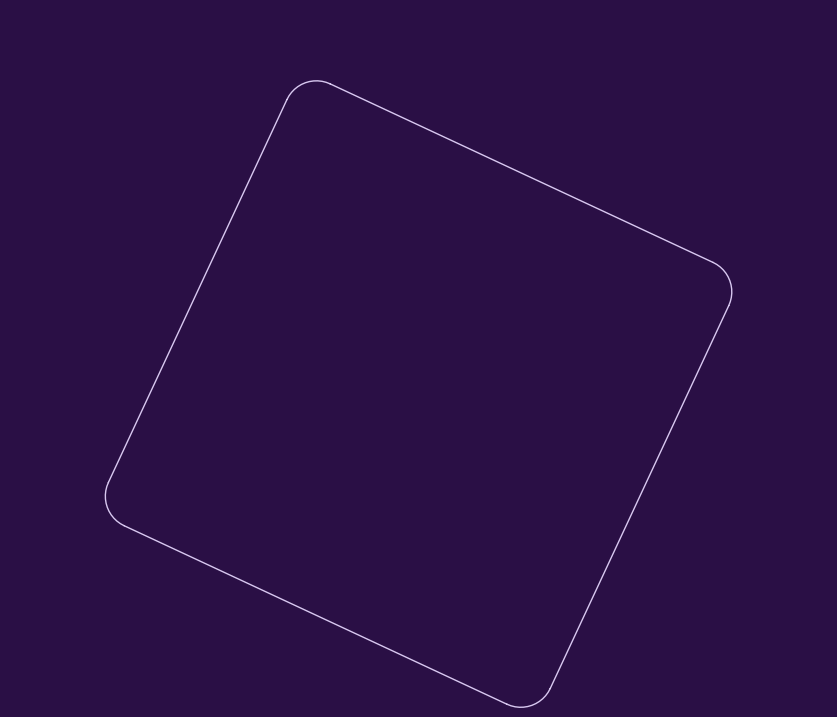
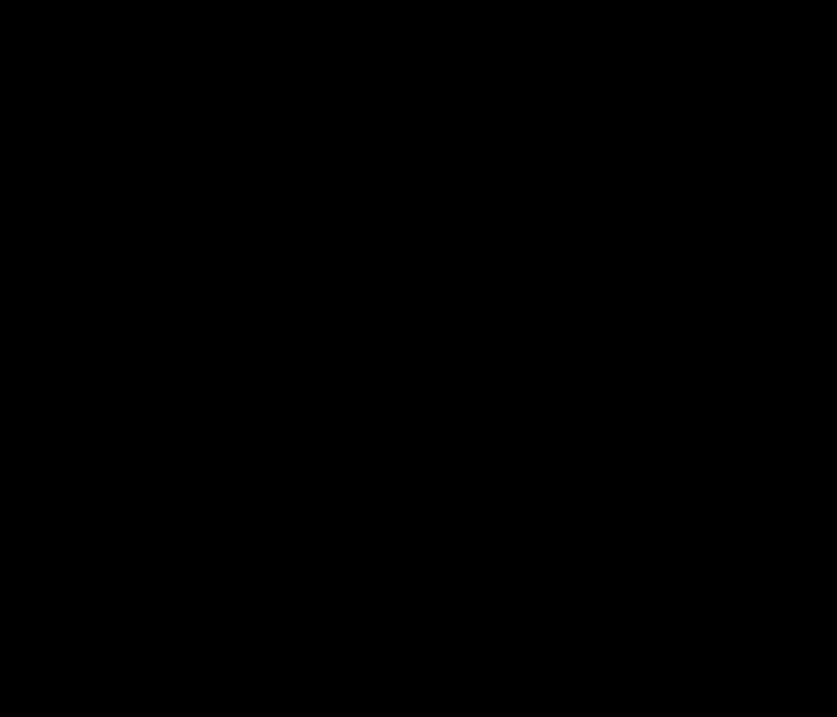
board edge: (330, 83) (713, 262) (723, 269) (729, 280) (731, 293) (728, 305) (550, 688) (542, 698) (531, 705) (519, 707) (507, 704) (124, 525) (113, 518) (107, 507) (105, 494) (108, 482) (286, 99) (294, 89) (305, 82) (317, 80) (330, 83) -> none

